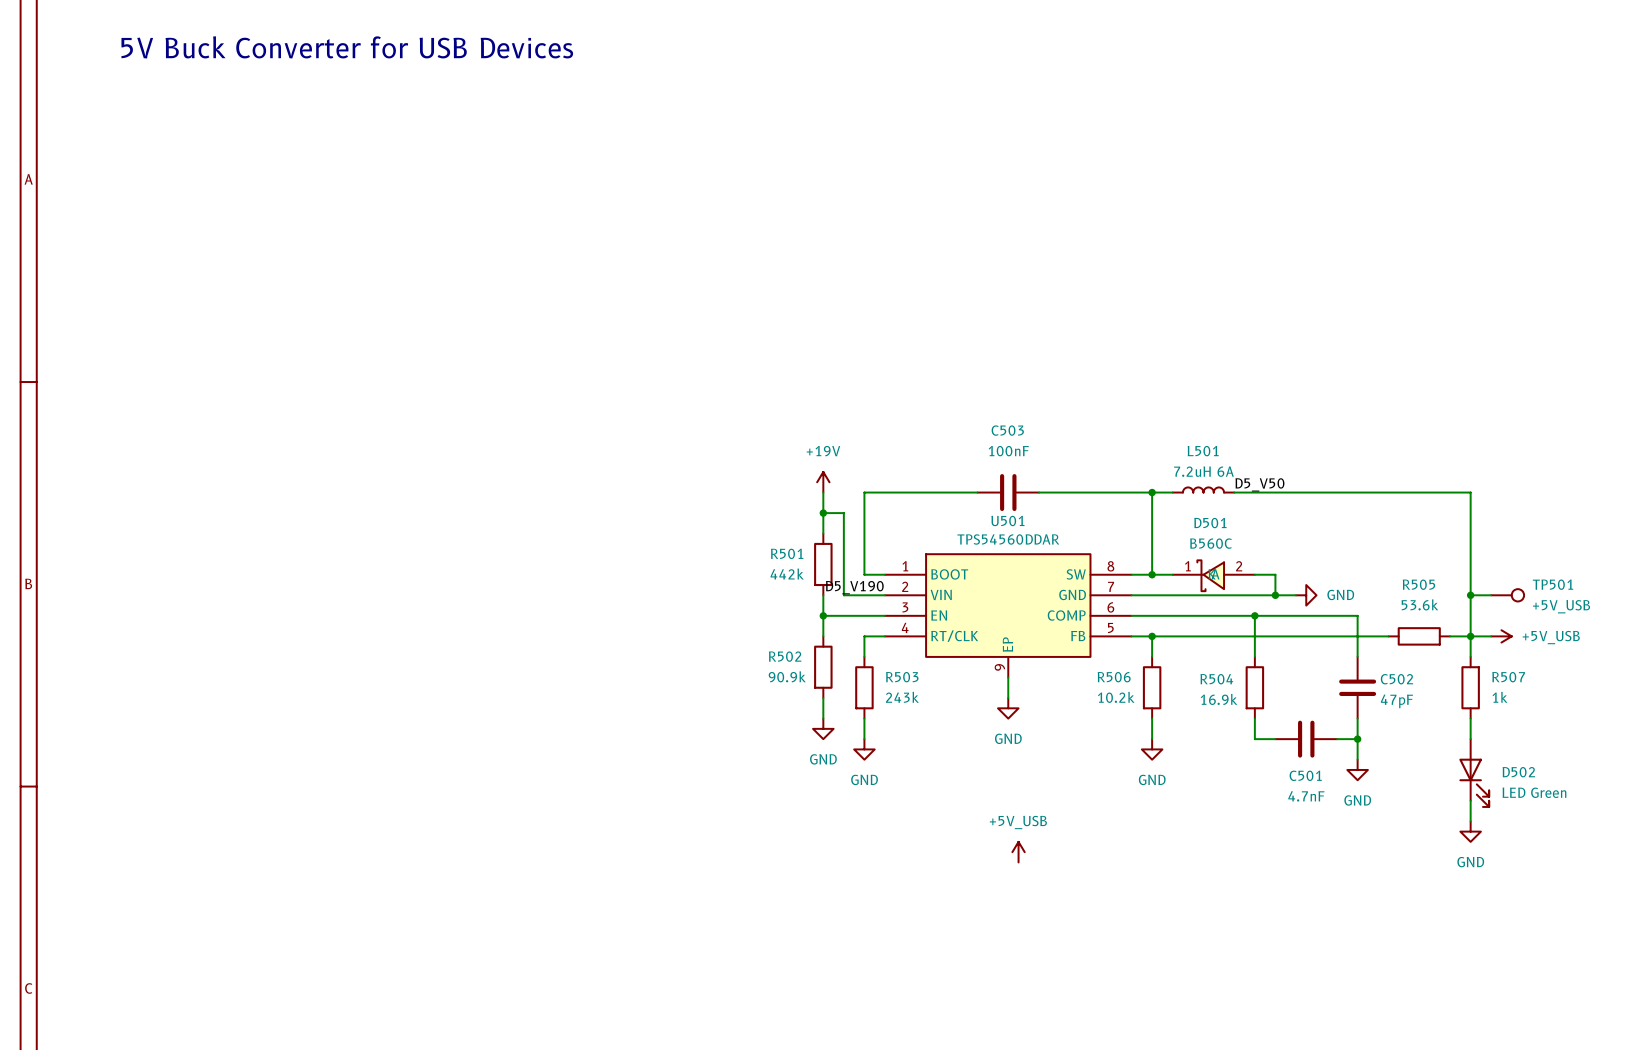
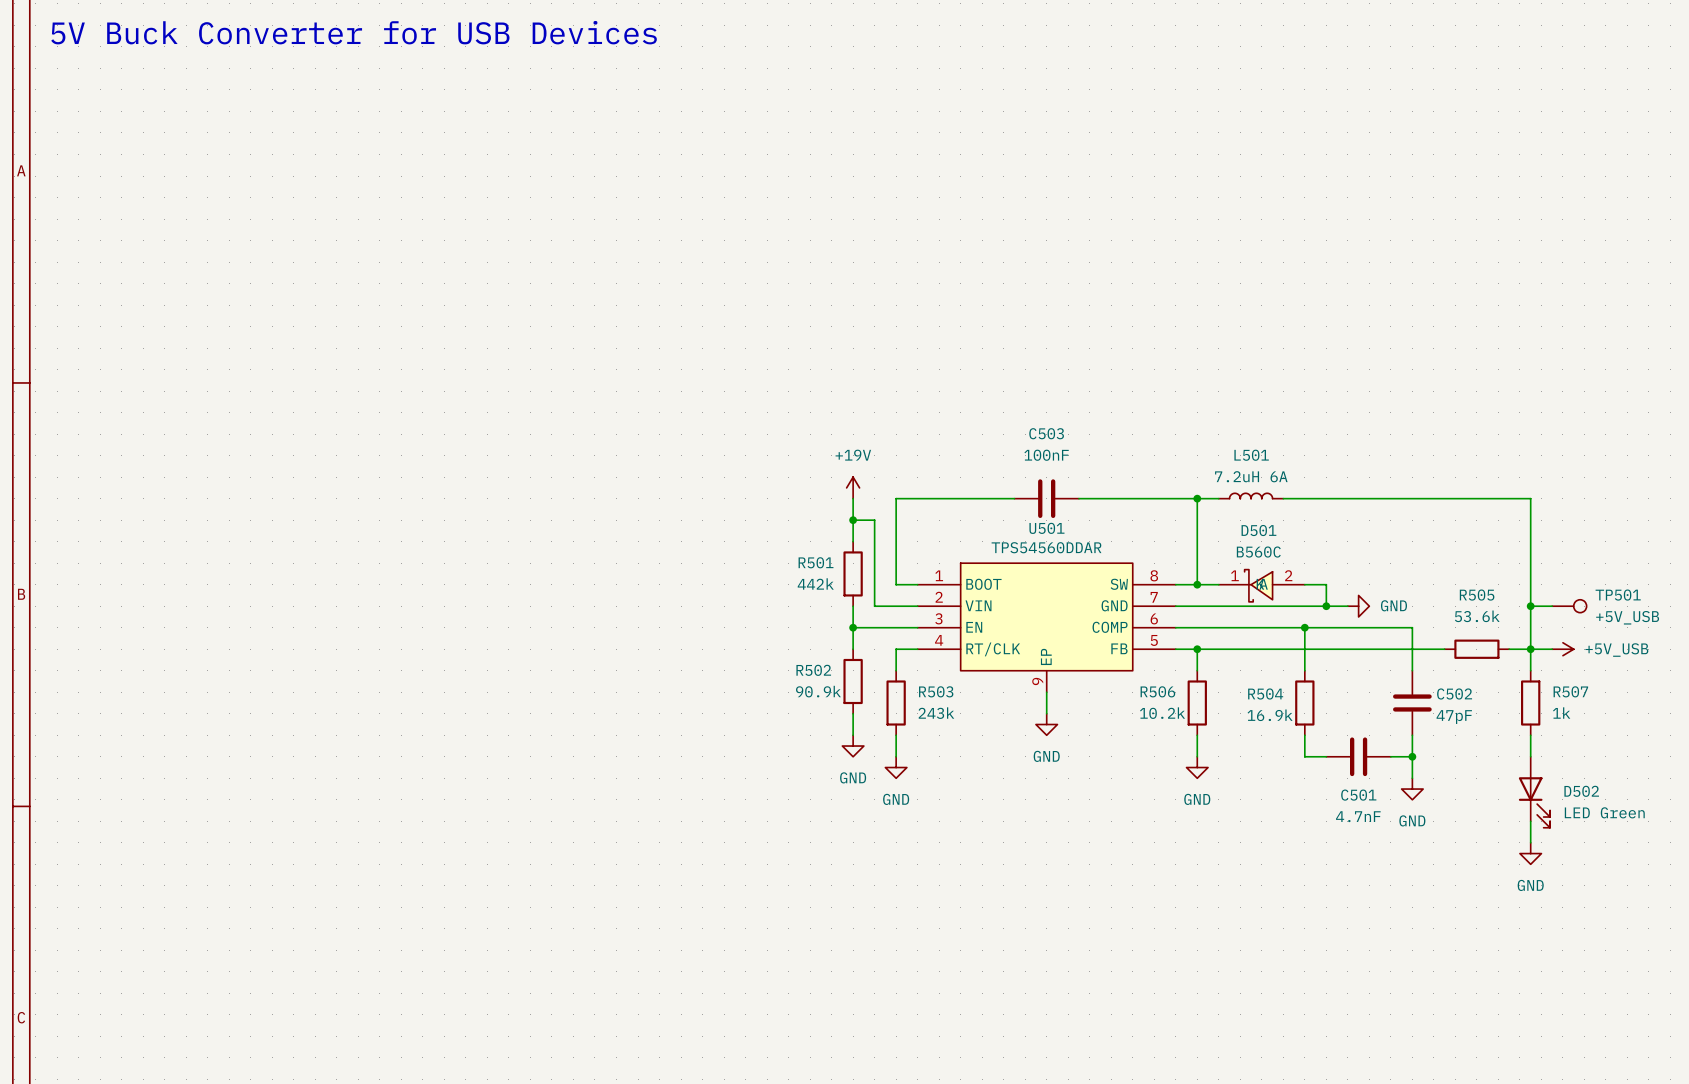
label: D5_V50 (1259, 484) -> none
label: D5_V190 (854, 587) -> none
power symbol: +5V_USB (1018, 852) -> none

